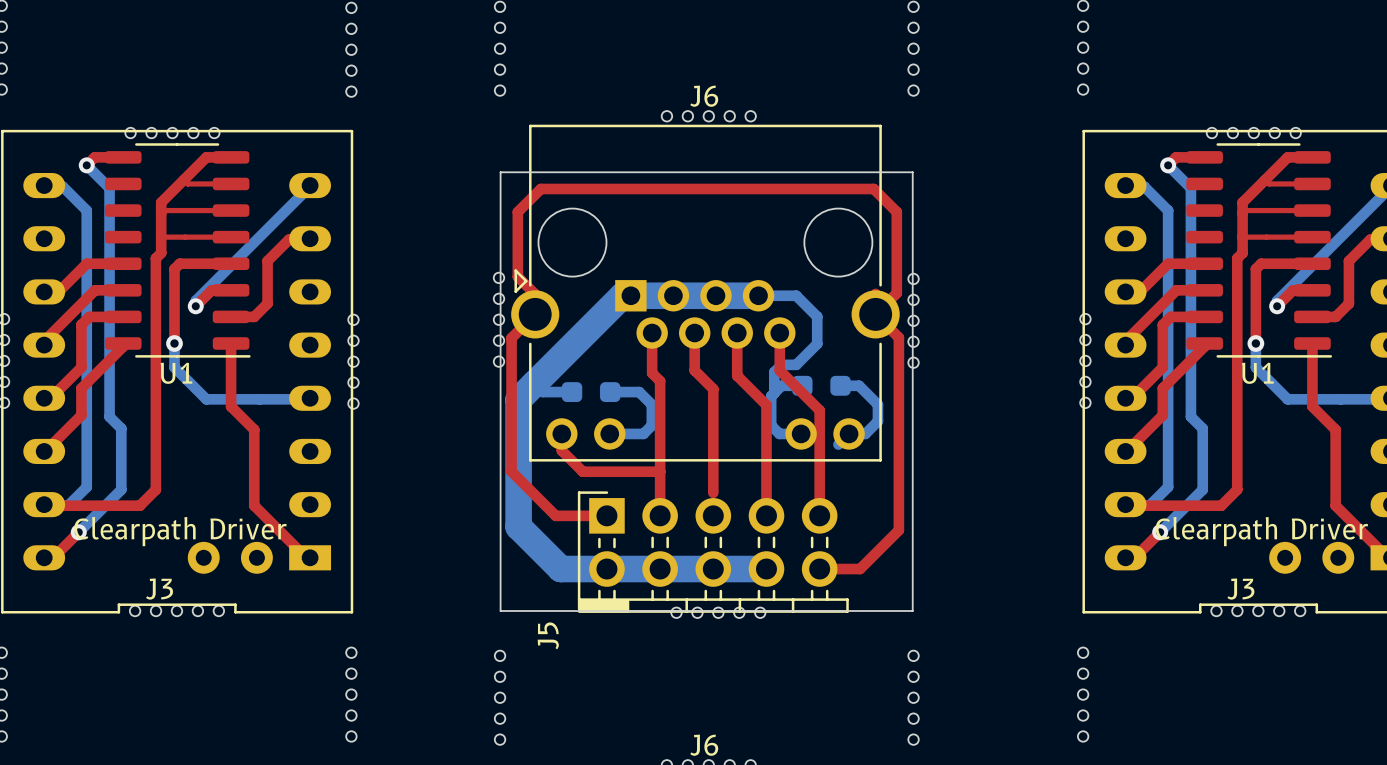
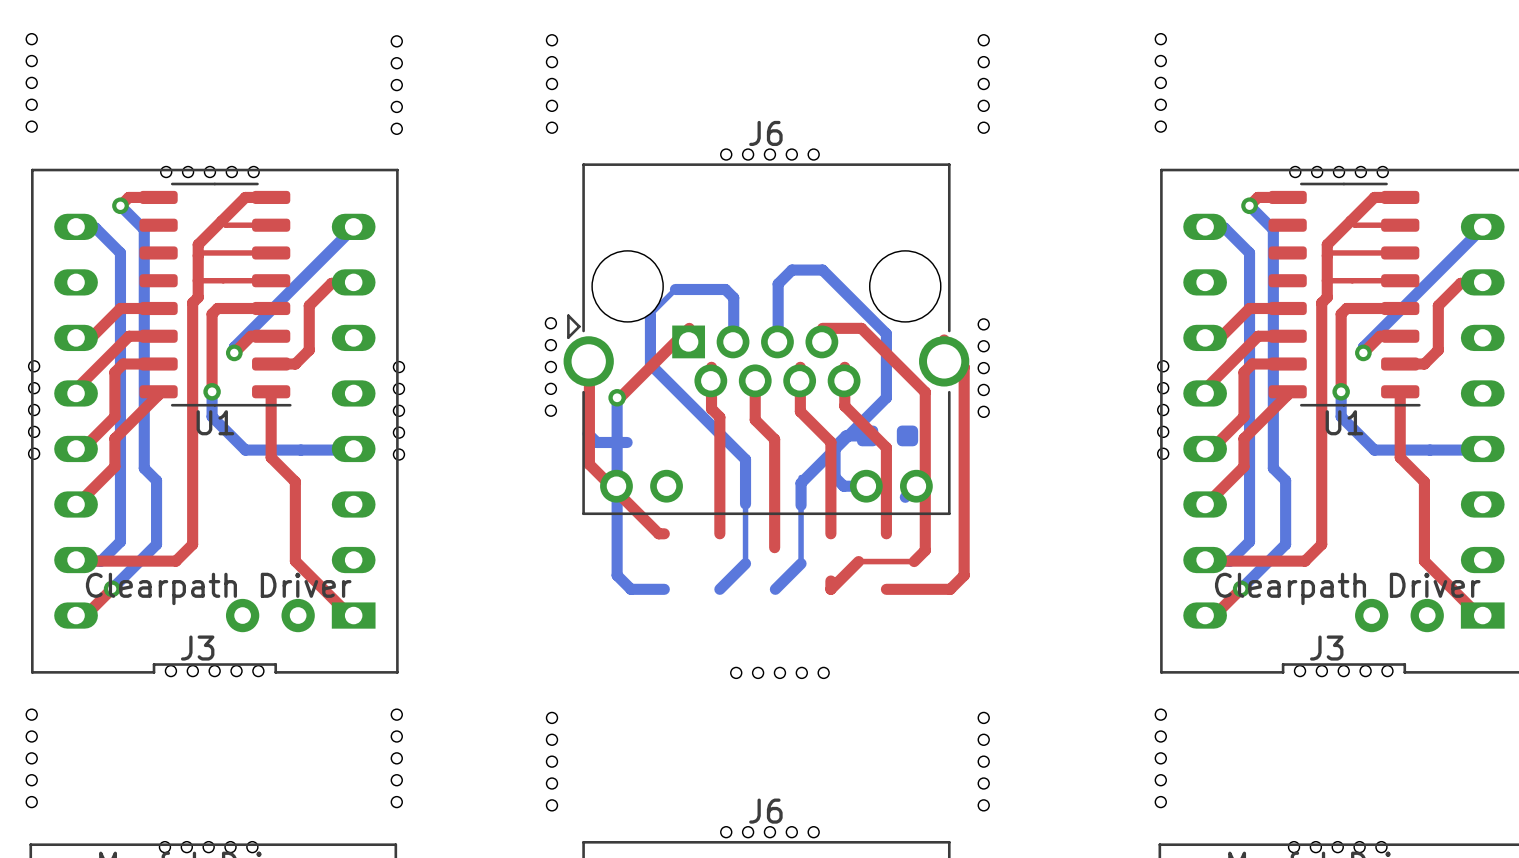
board edge: (500, 172) (500, 611) (912, 611) (912, 172) (500, 172) -> none
top track: none -> (689, 328) (619, 397) (617, 397)
bottom track: none -> (733, 328) (733, 297) (725, 289) (675, 289) (650, 314) (650, 364) (745, 459) (745, 503)
bottom track: none -> (778, 328) (778, 283) (792, 270) (822, 270) (886, 333) (886, 397) (801, 483) (801, 505)
top track: none -> (822, 328) (861, 328) (925, 392) (925, 550) (914, 561) (858, 561) (830, 589) (830, 581)
top track: none -> (589, 347) (589, 464) (658, 533) (664, 533)
top track: none -> (944, 347) (964, 367) (964, 575) (950, 589) (886, 589)
top track: none -> (711, 367) (711, 408) (719, 417) (719, 533)
top track: none -> (800, 367) (800, 411) (830, 442) (830, 533)
top track: none -> (844, 367) (844, 406) (886, 447) (886, 533)
top track: (652, 333) (652, 373) (660, 381) (660, 515) -> none
top track: (737, 333) (737, 375) (766, 405) (766, 515) -> none
top track: (779, 333) (779, 370) (819, 410) (819, 515) -> none
bottom track: none -> (617, 397) (617, 575) (631, 589) (664, 589)
via: none -> (617, 397)
bottom track: (840, 385) (859, 385) (877, 404) (877, 421) (865, 433) (849, 433) (840, 425) -> none
part: (591, 392) -> none
bottom track: (609, 392) (639, 392) (651, 404) (651, 425) (643, 433) (609, 433) -> none
bottom track: (774, 393) (774, 372) (781, 364) (796, 364) (817, 343) (817, 316) (796, 295) (622, 295) (518, 399) (518, 526) (560, 569) (766, 569) -> none
bottom track: none -> (745, 465) (745, 563) (719, 589)
bottom track: none -> (801, 477) (801, 563) (775, 589)
top track: (561, 433) (561, 450) (582, 471) (660, 471) -> none
top track: (606, 515) (555, 515) (511, 471) (511, 338) (535, 314) (535, 294) (517, 276) (517, 212) (540, 188) (873, 188) (896, 212) (896, 293) (875, 314) (898, 337) (898, 530) (860, 569) (819, 569) -> none
J5: (713, 552) -> none

